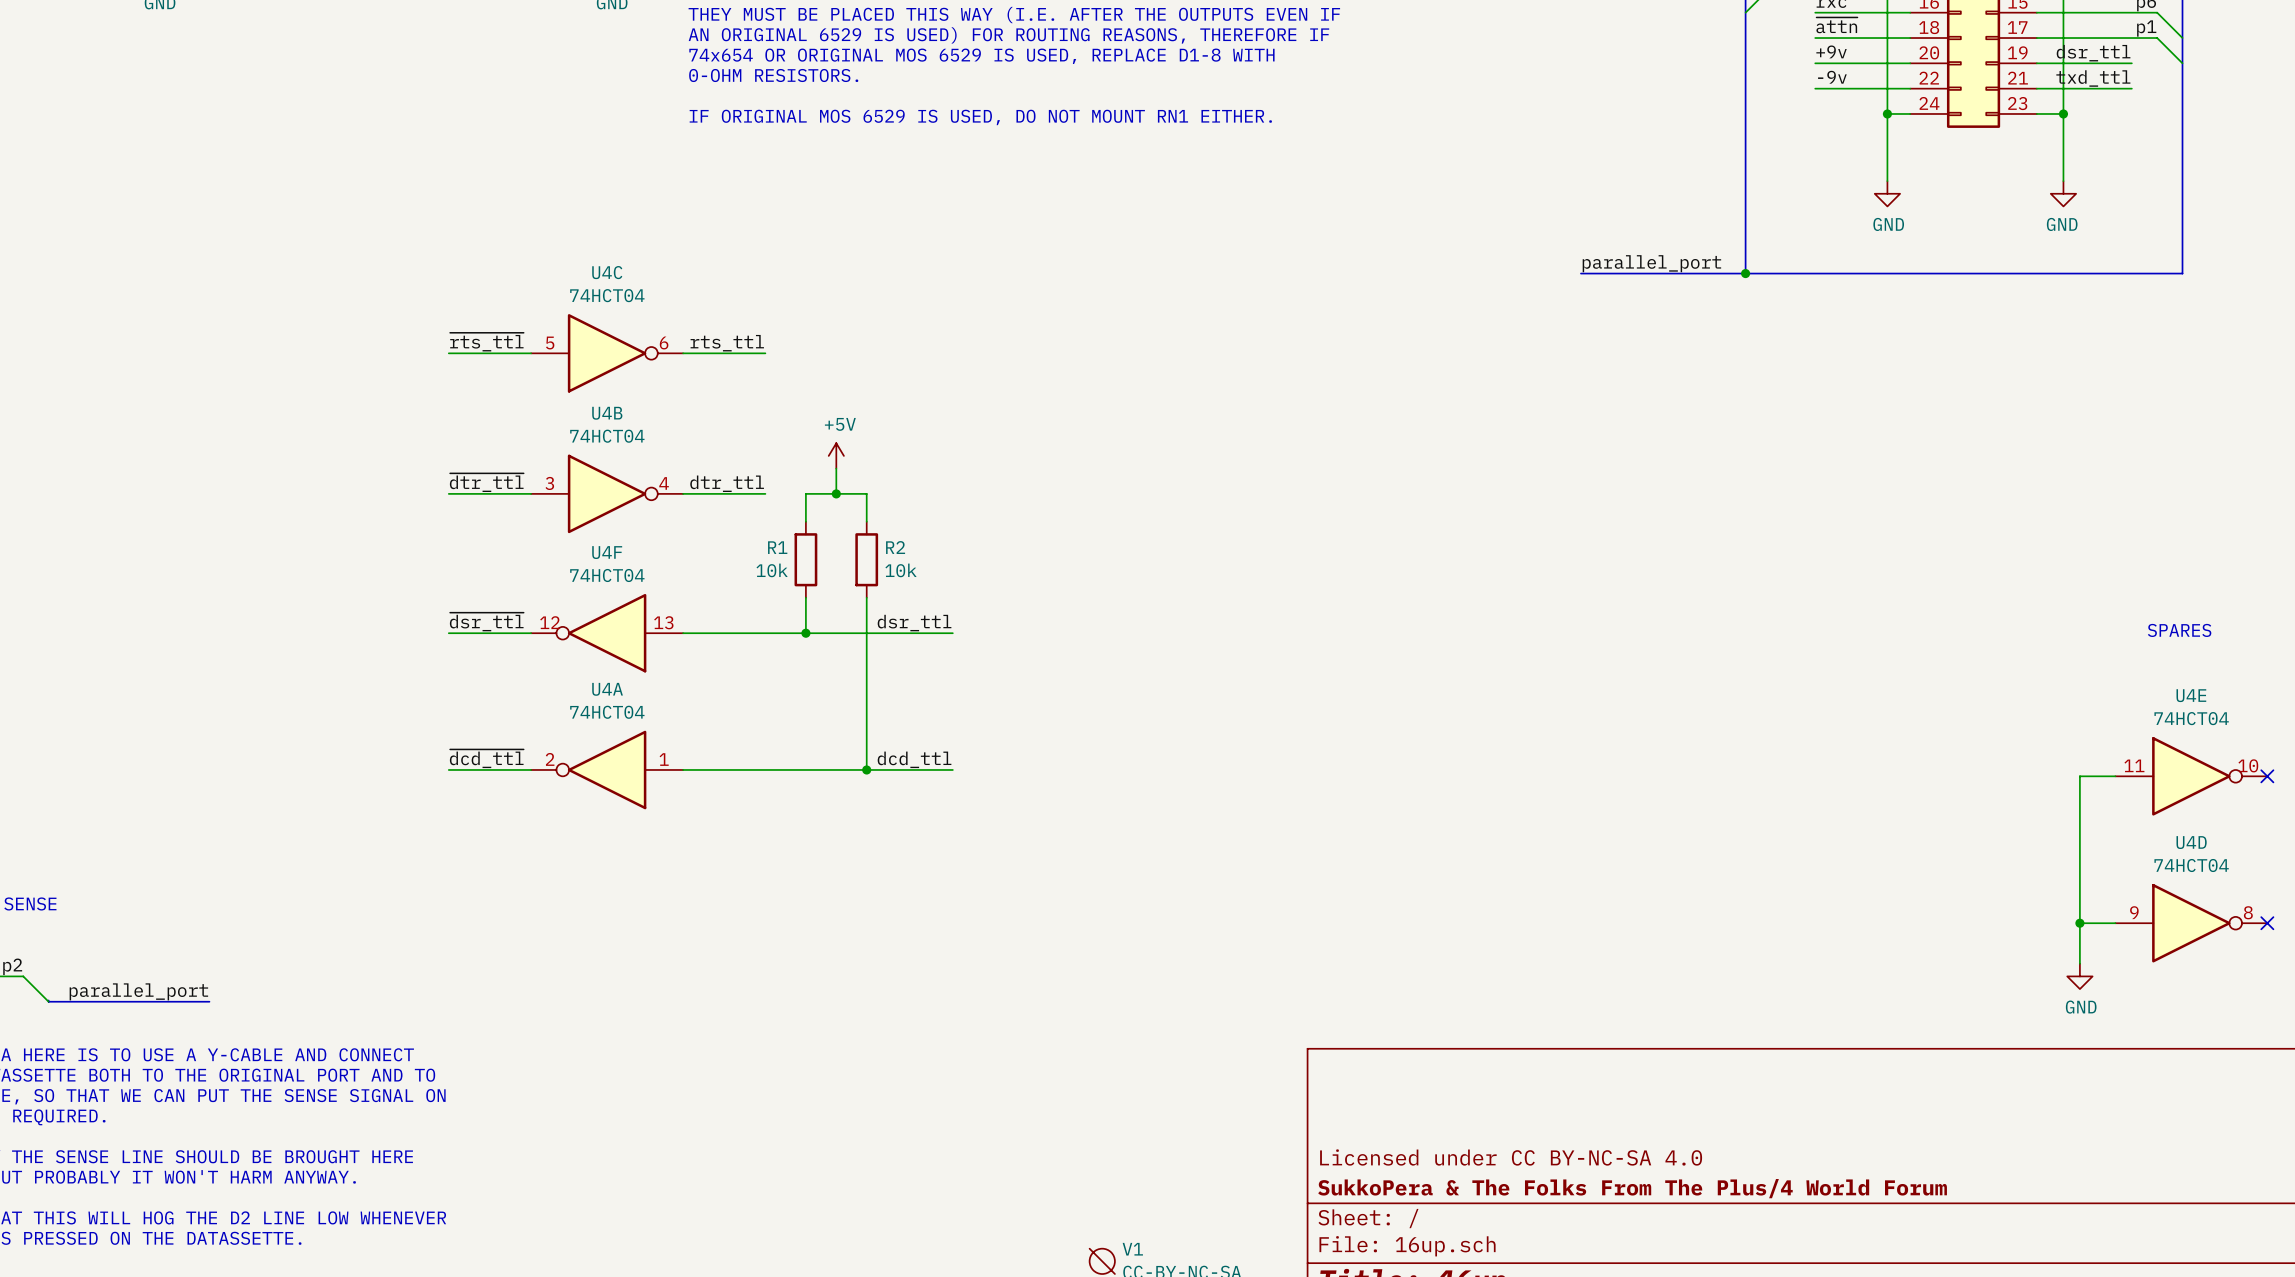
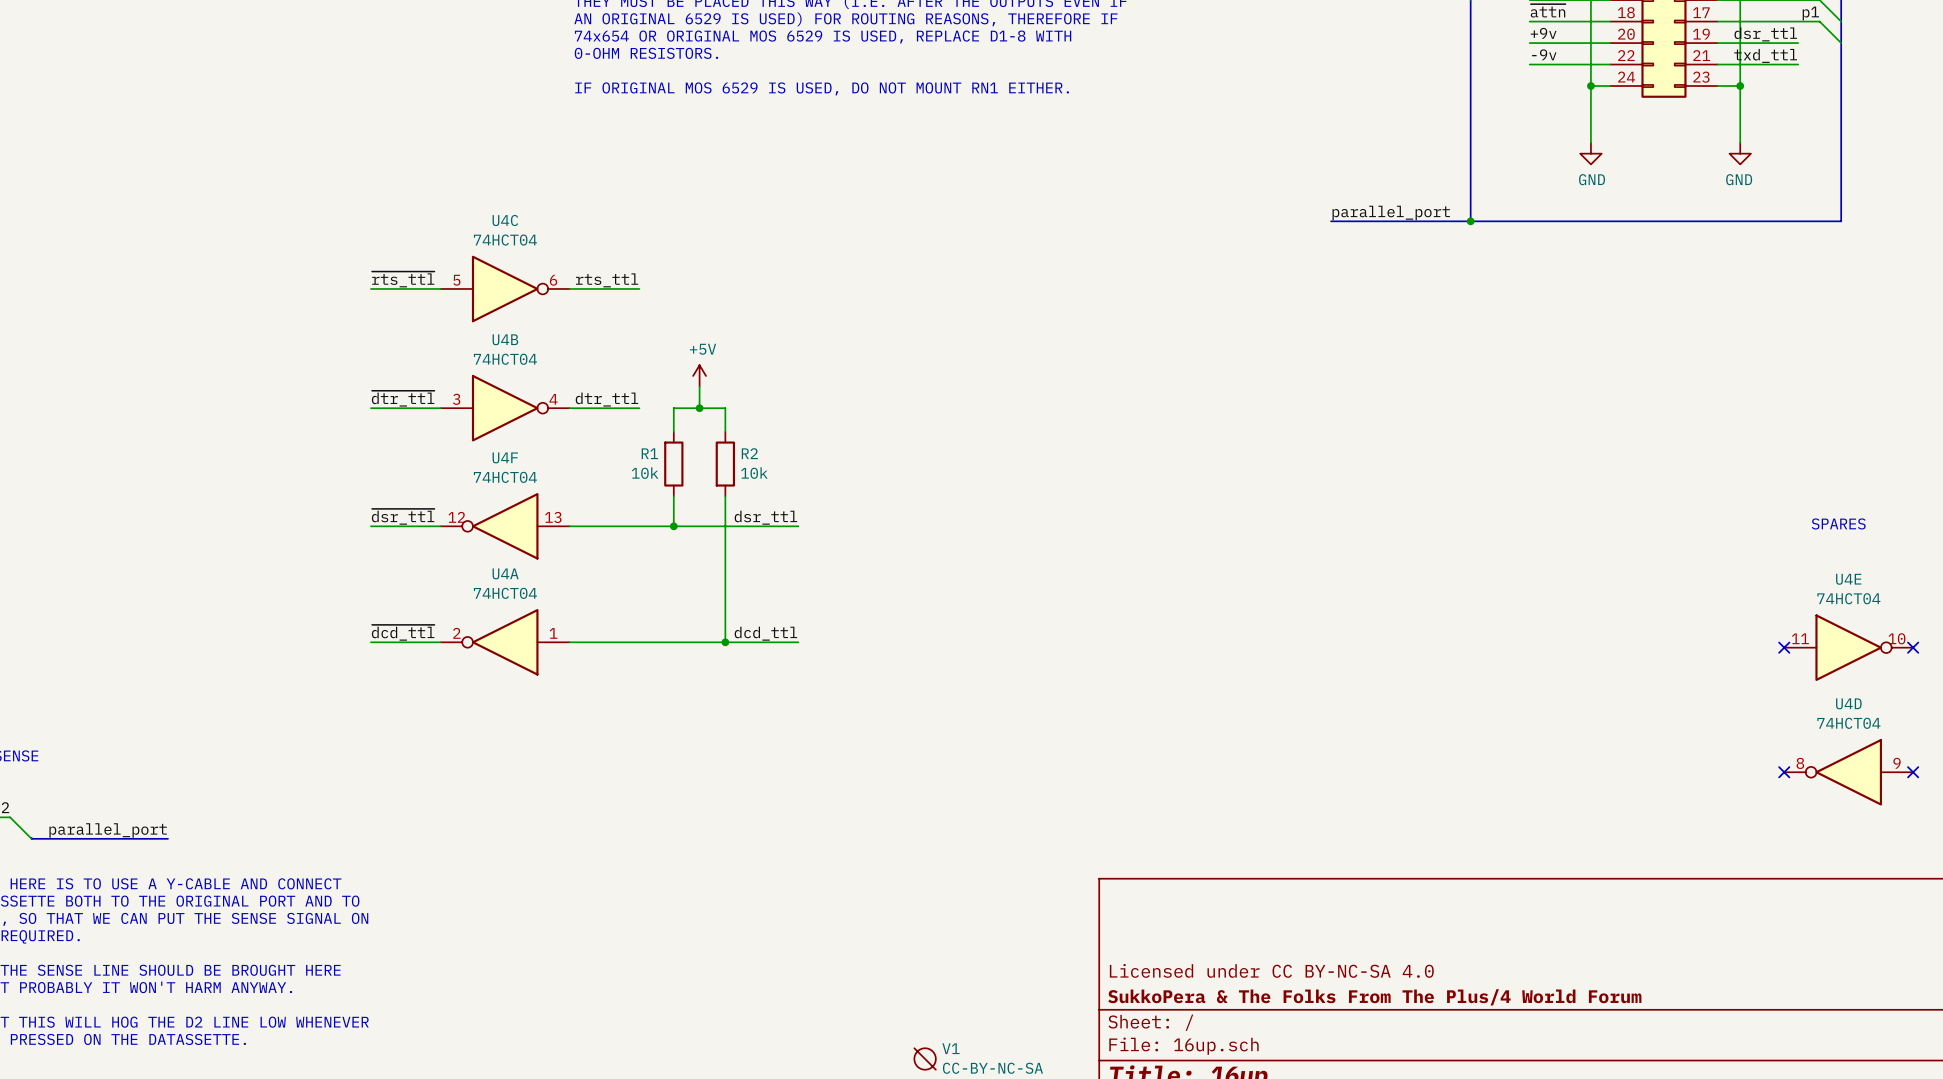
wire: (2115, 776) (2079, 776) (2079, 963) -> none
no-connect mark: none -> (1784, 647)
wire: (2079, 923) (2115, 923) -> none
junction: (2079, 923) -> none
no-connect mark: none -> (1784, 772)
U4D rotation: 0° (2191, 923) -> 180° (1848, 772)
power symbol: GND (2079, 976) -> none

